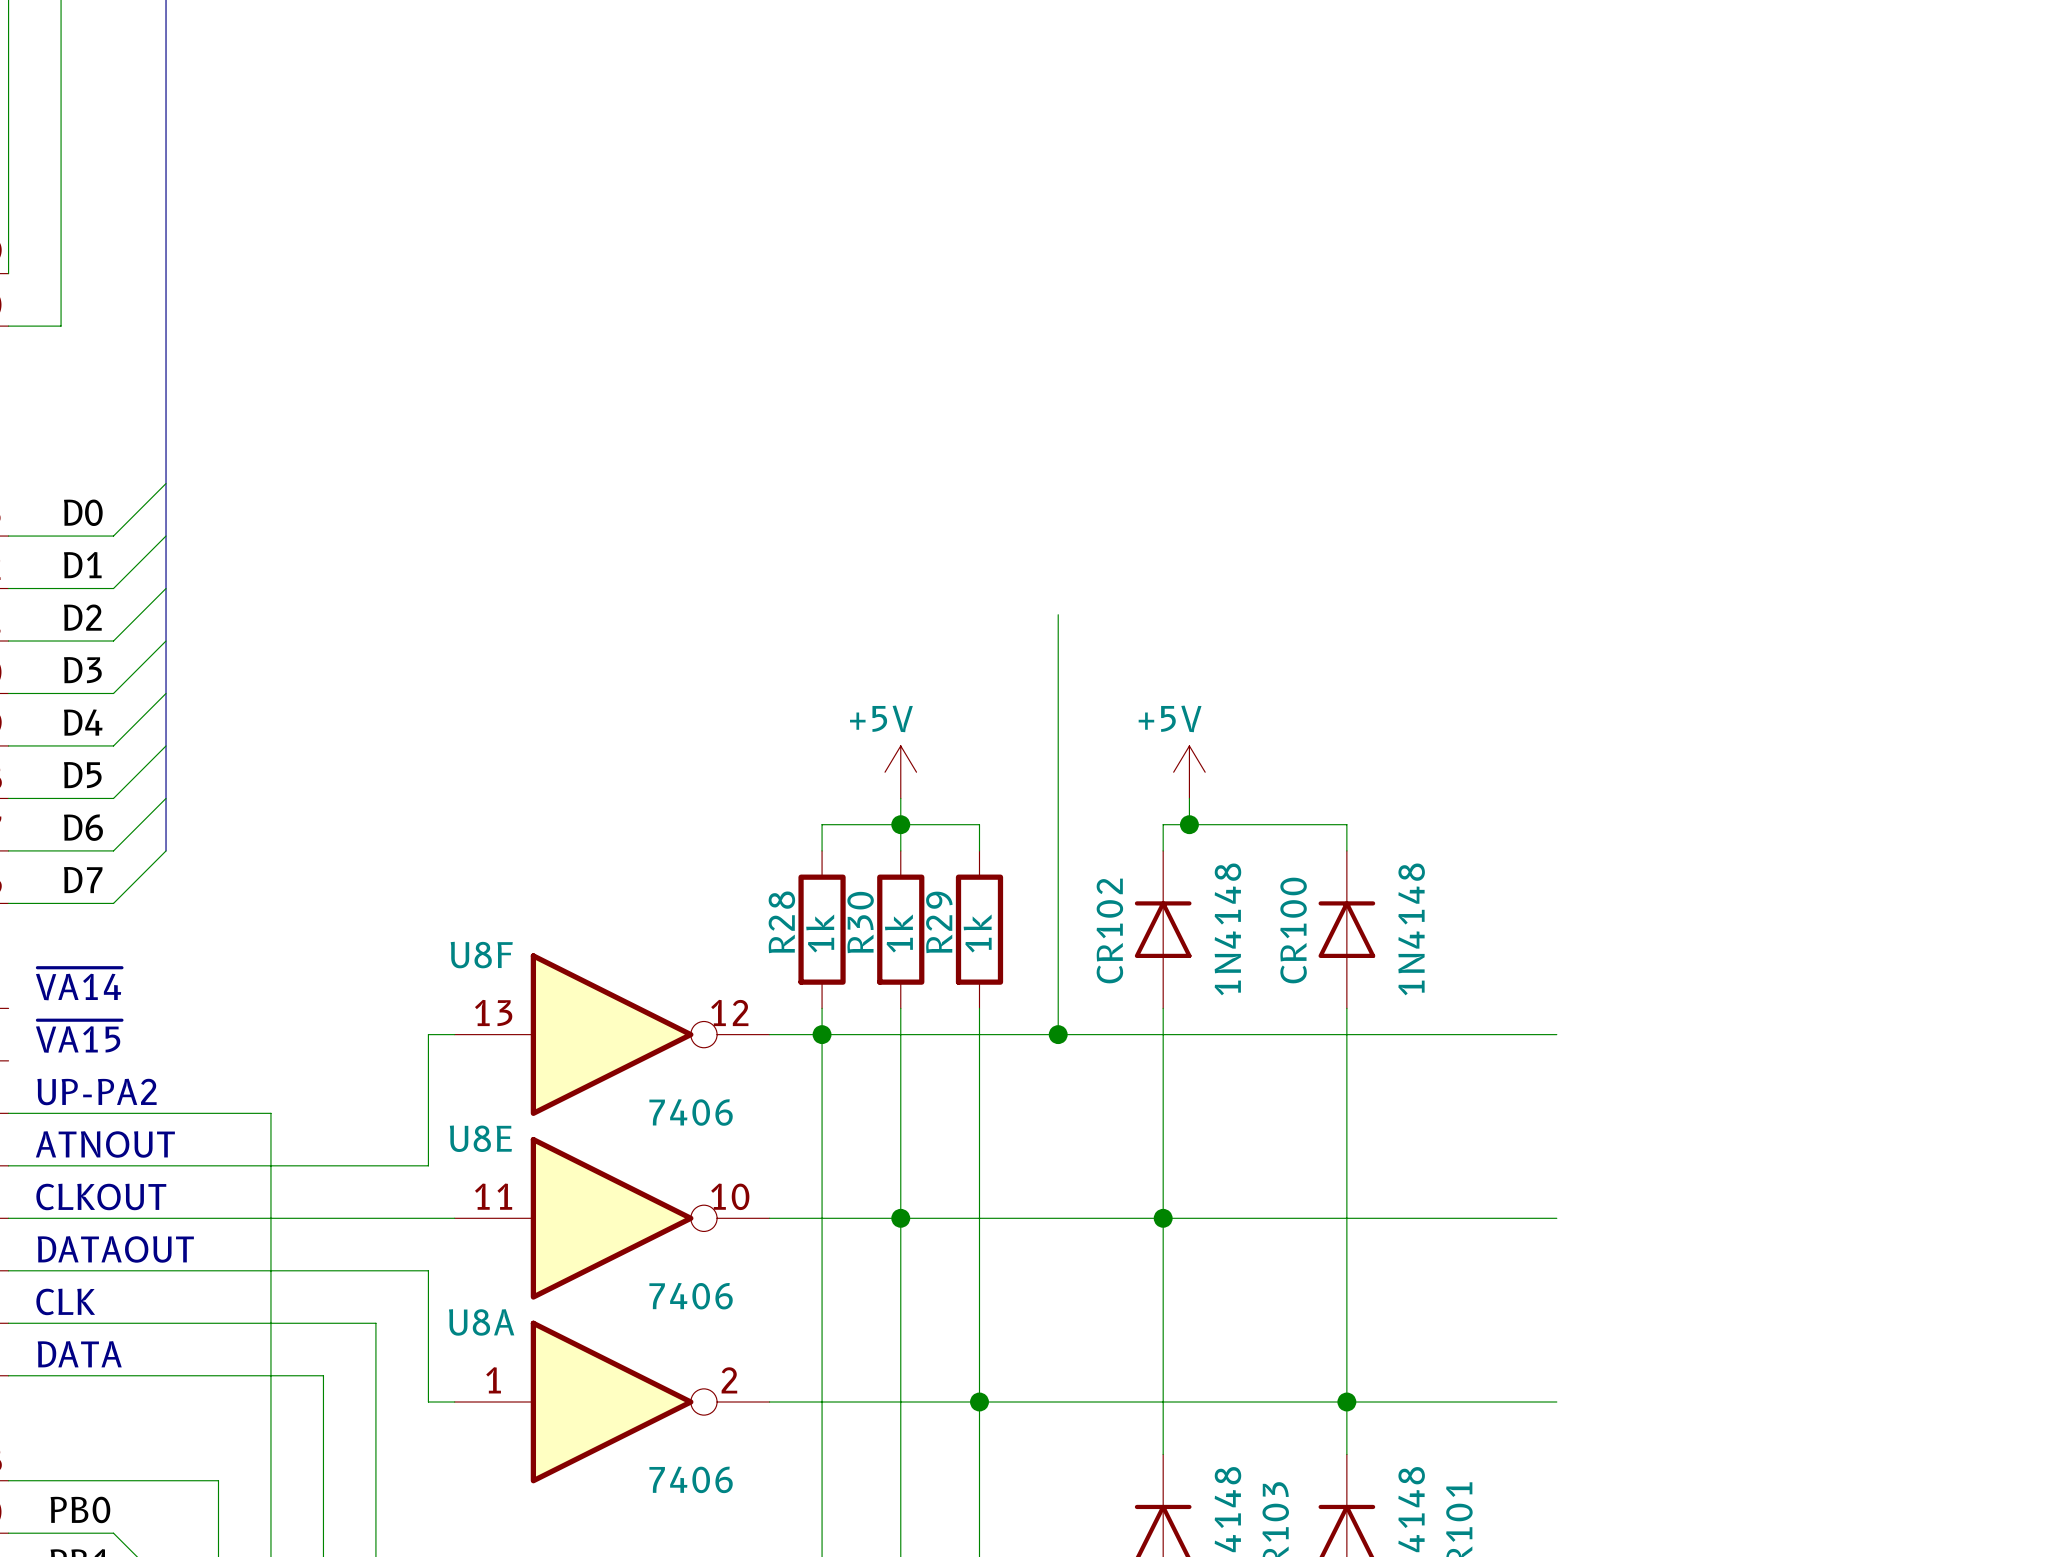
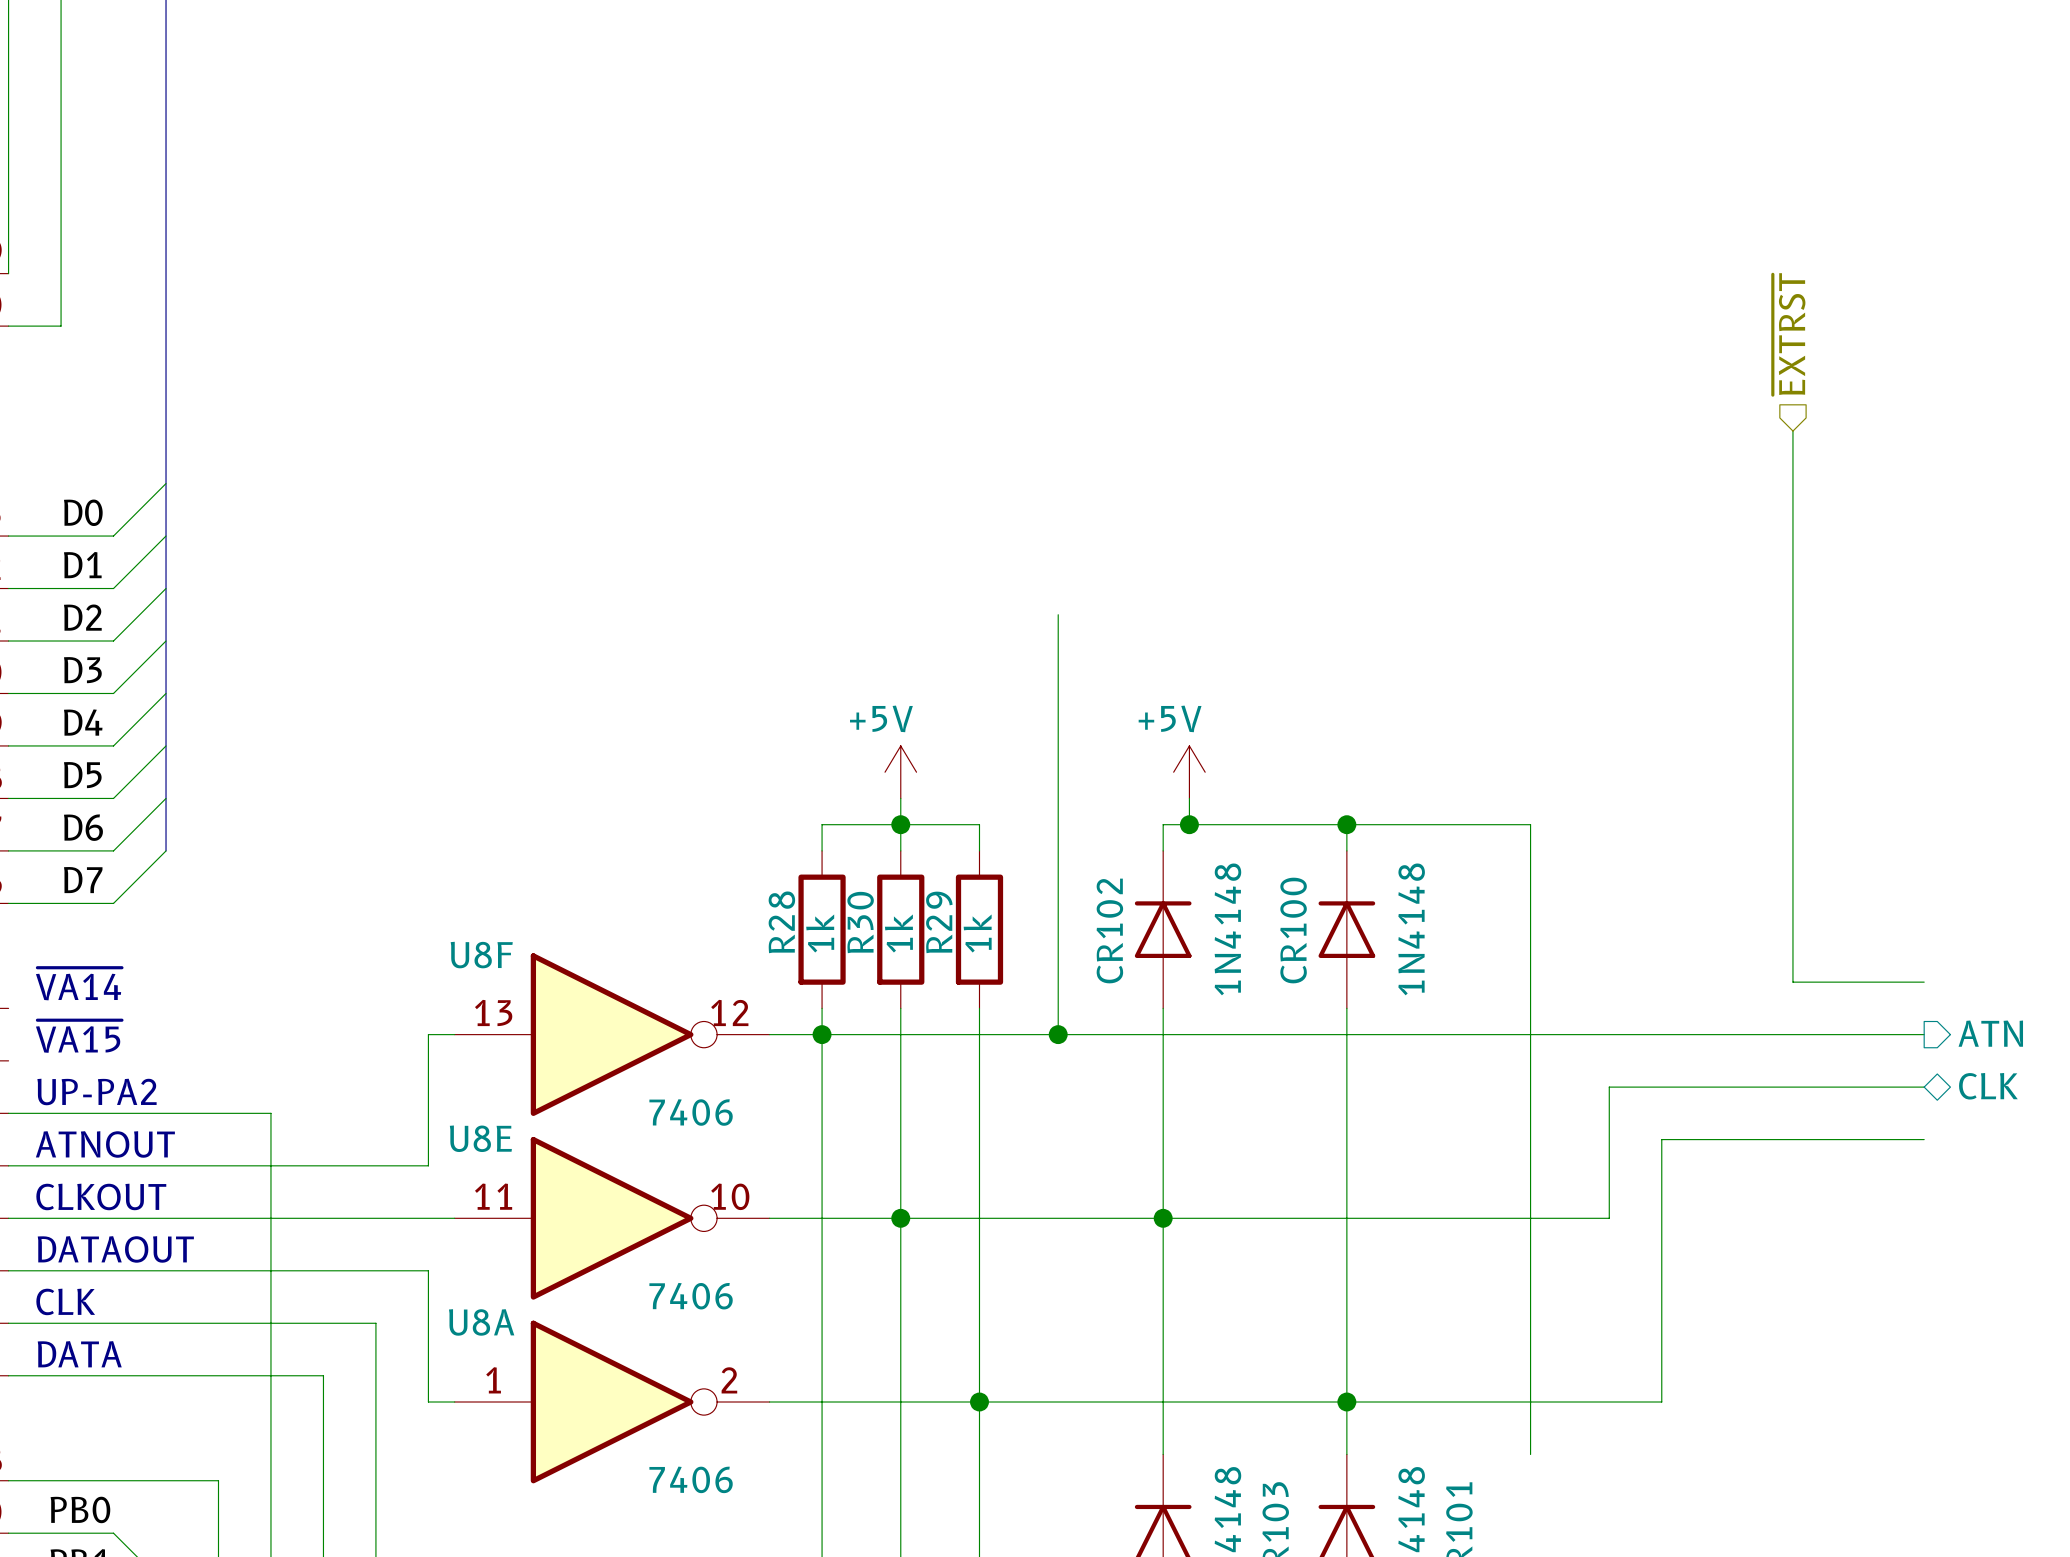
hierarchical label: none -> ~{EXTRST} (1789, 334)
wire: none -> (1792, 431) (1792, 982) (1924, 982)
wire: none -> (1346, 824) (1530, 824) (1530, 1454)
junction: none -> (1346, 824)
sheet pin: none -> ATN (1990, 1033)
wire: none -> (1556, 1034) (1924, 1034)
sheet pin: none -> CLK (1988, 1086)
wire: none -> (1924, 1087) (1609, 1087) (1609, 1218) (1556, 1218)
wire: none -> (1924, 1139) (1661, 1139) (1661, 1402) (1556, 1402)

